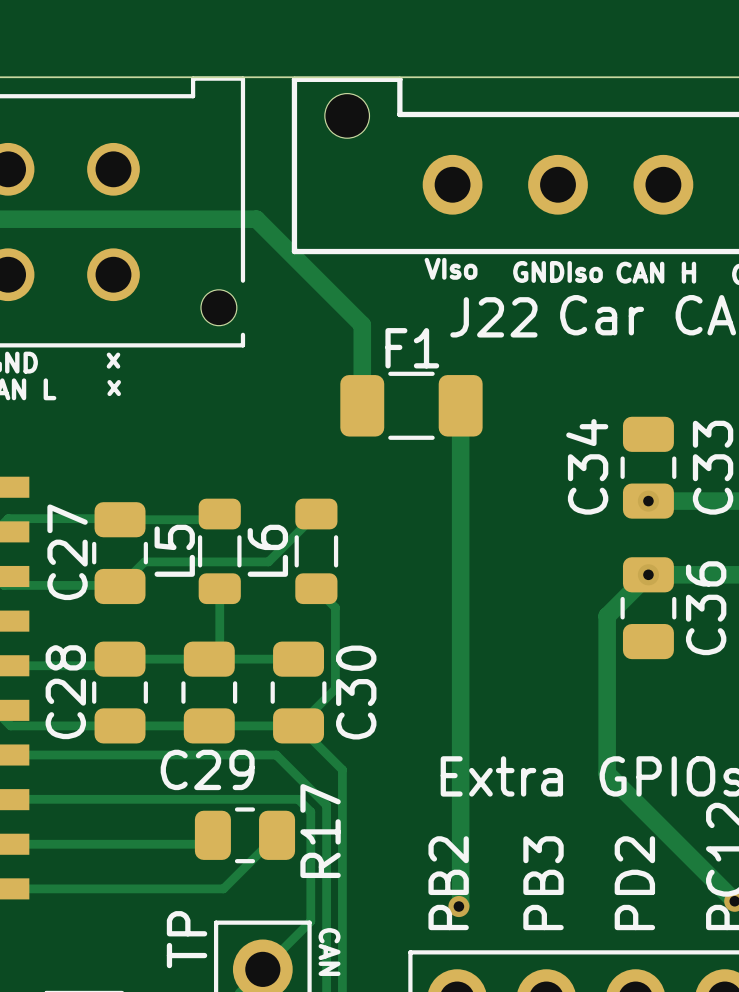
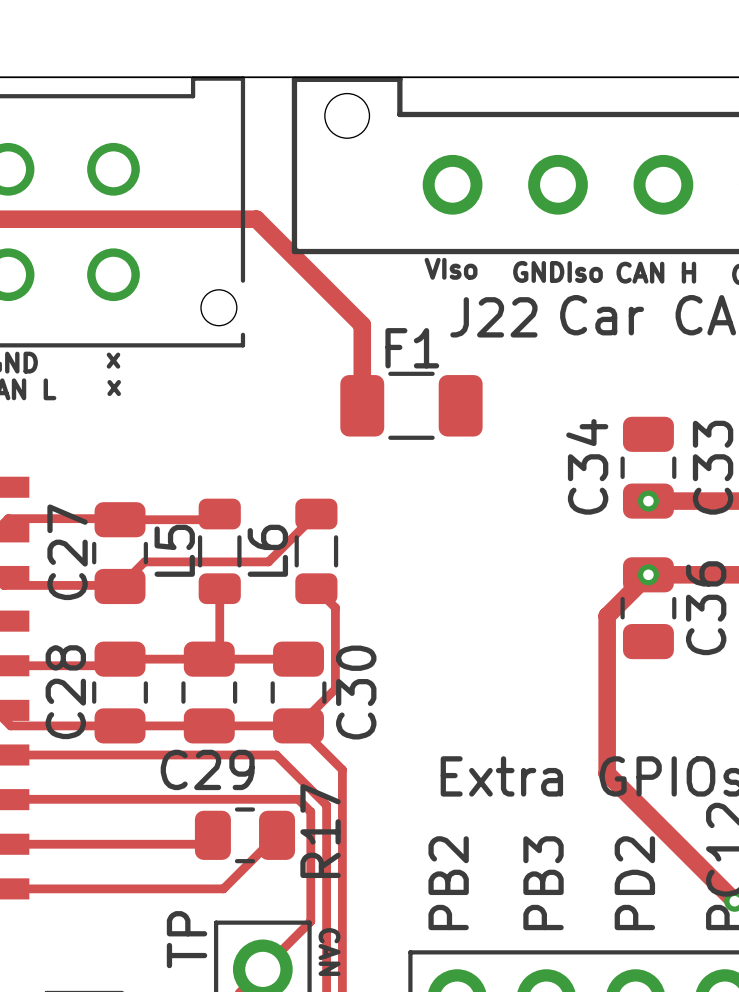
track: (460, 405) (460, 904) (458, 906) -> none
via: (458, 906) -> none

